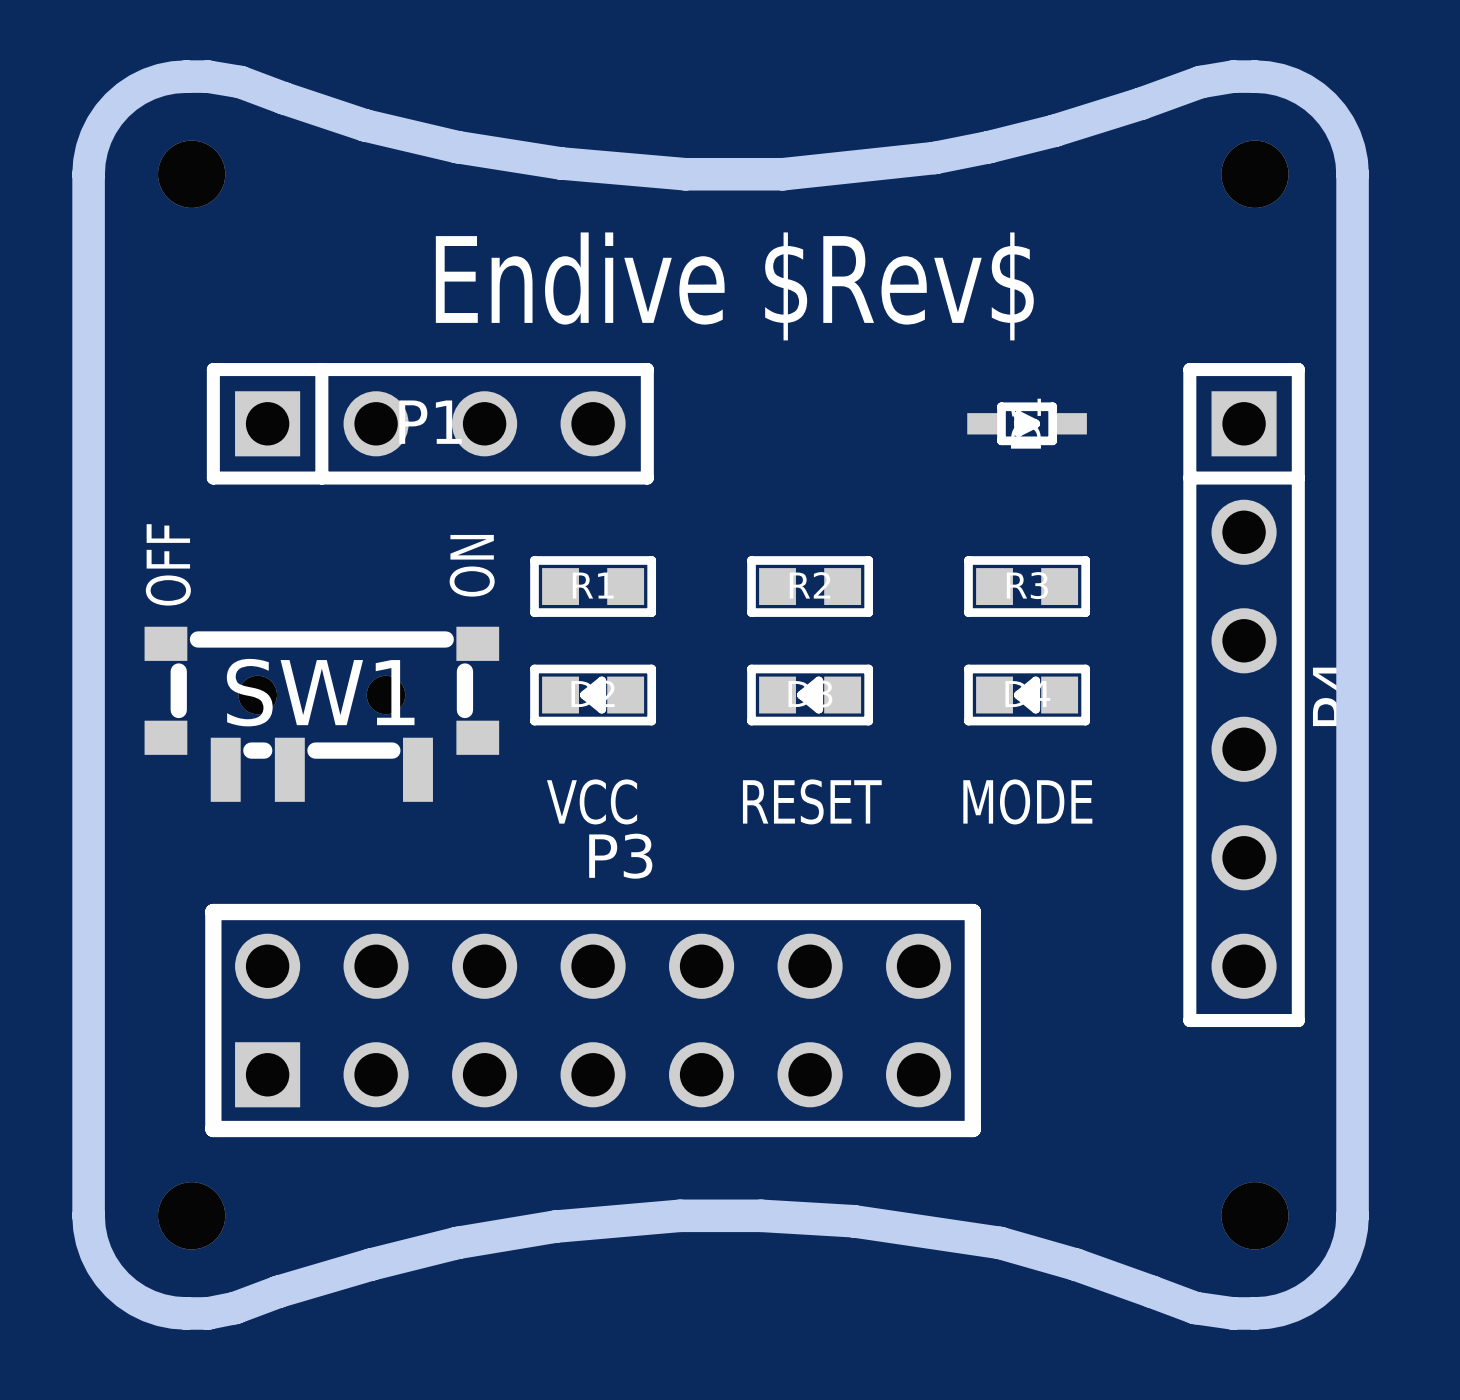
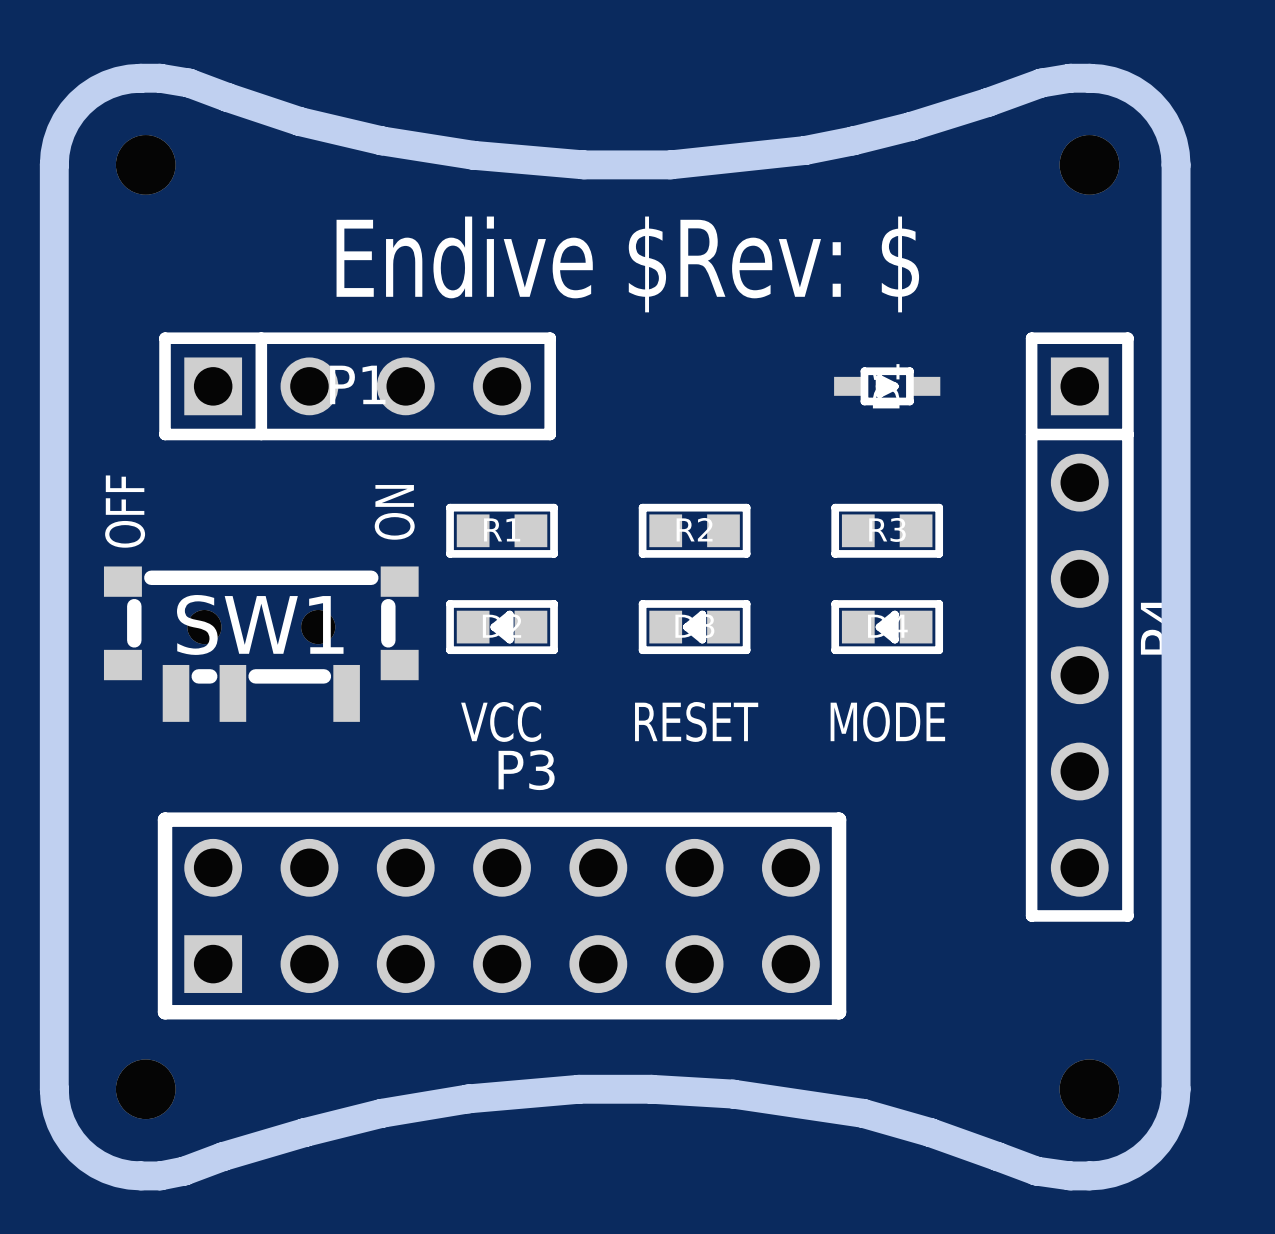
text: Endive $Rev$ (734, 286) -> Endive $Rev: $ (627, 264)

